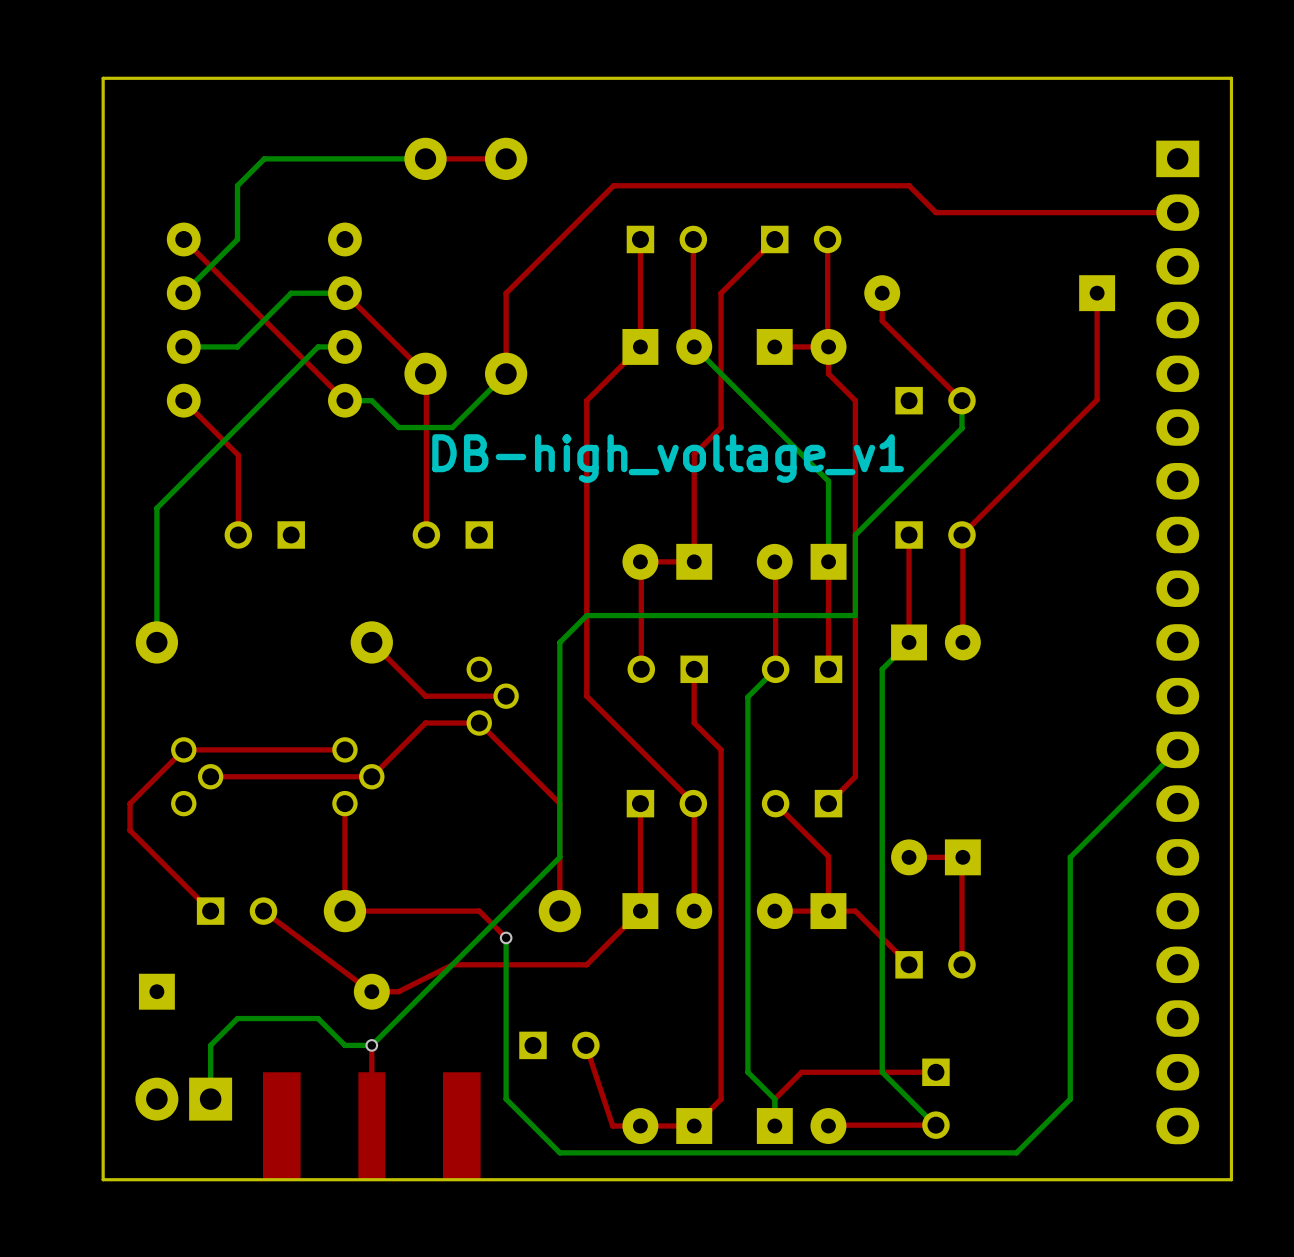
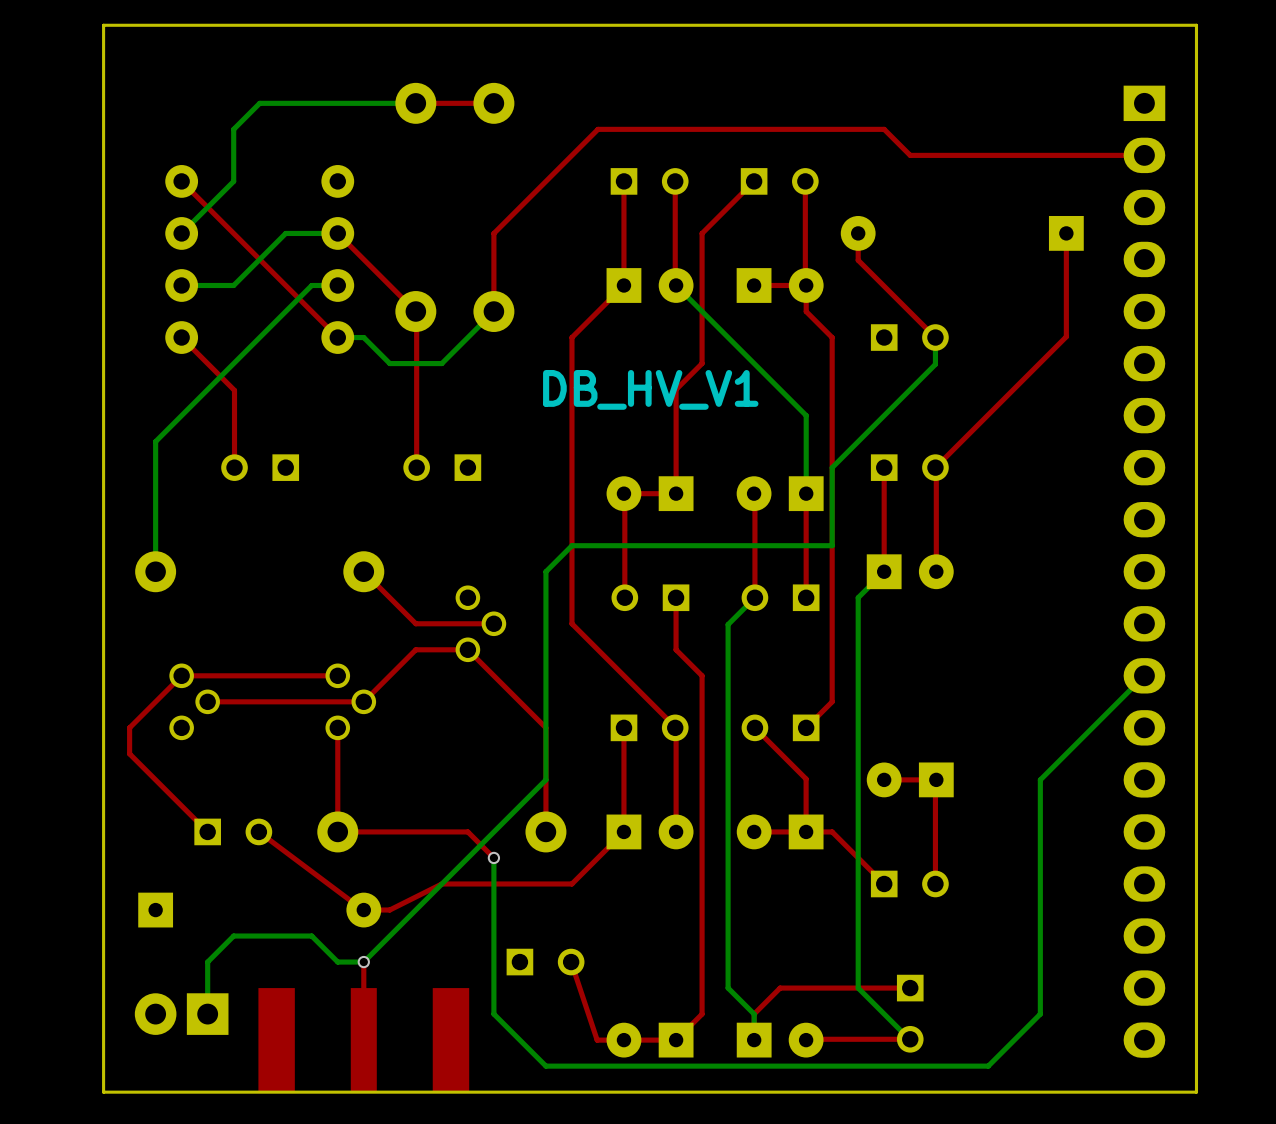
text: DB-high_voltage_v1 (668, 458) -> DB_HV_V1 (650, 389)

